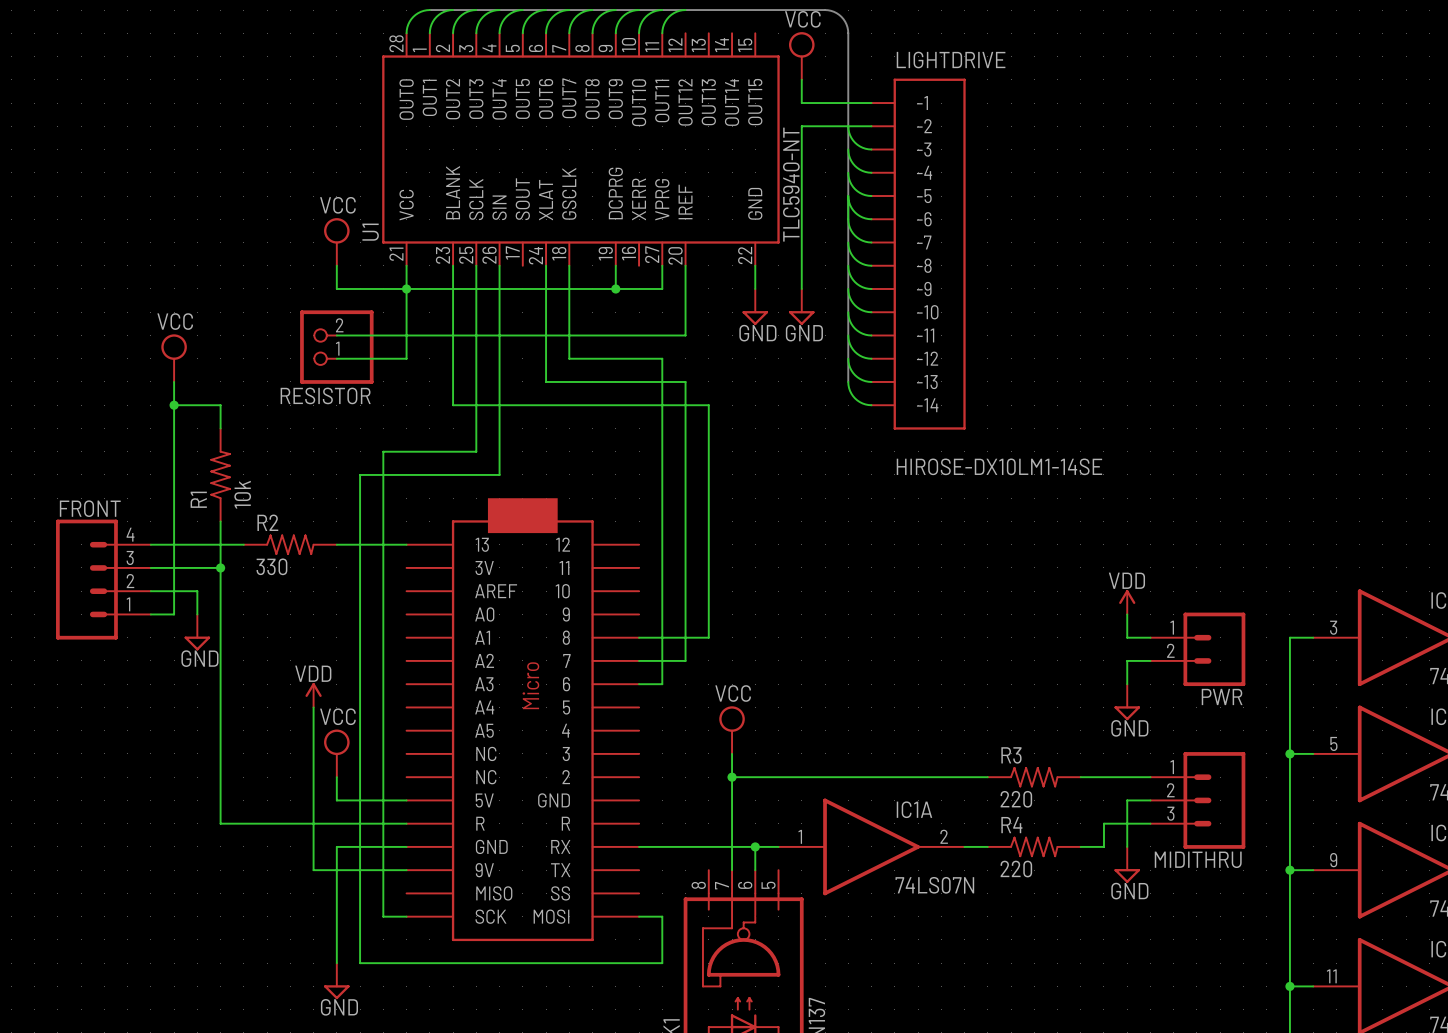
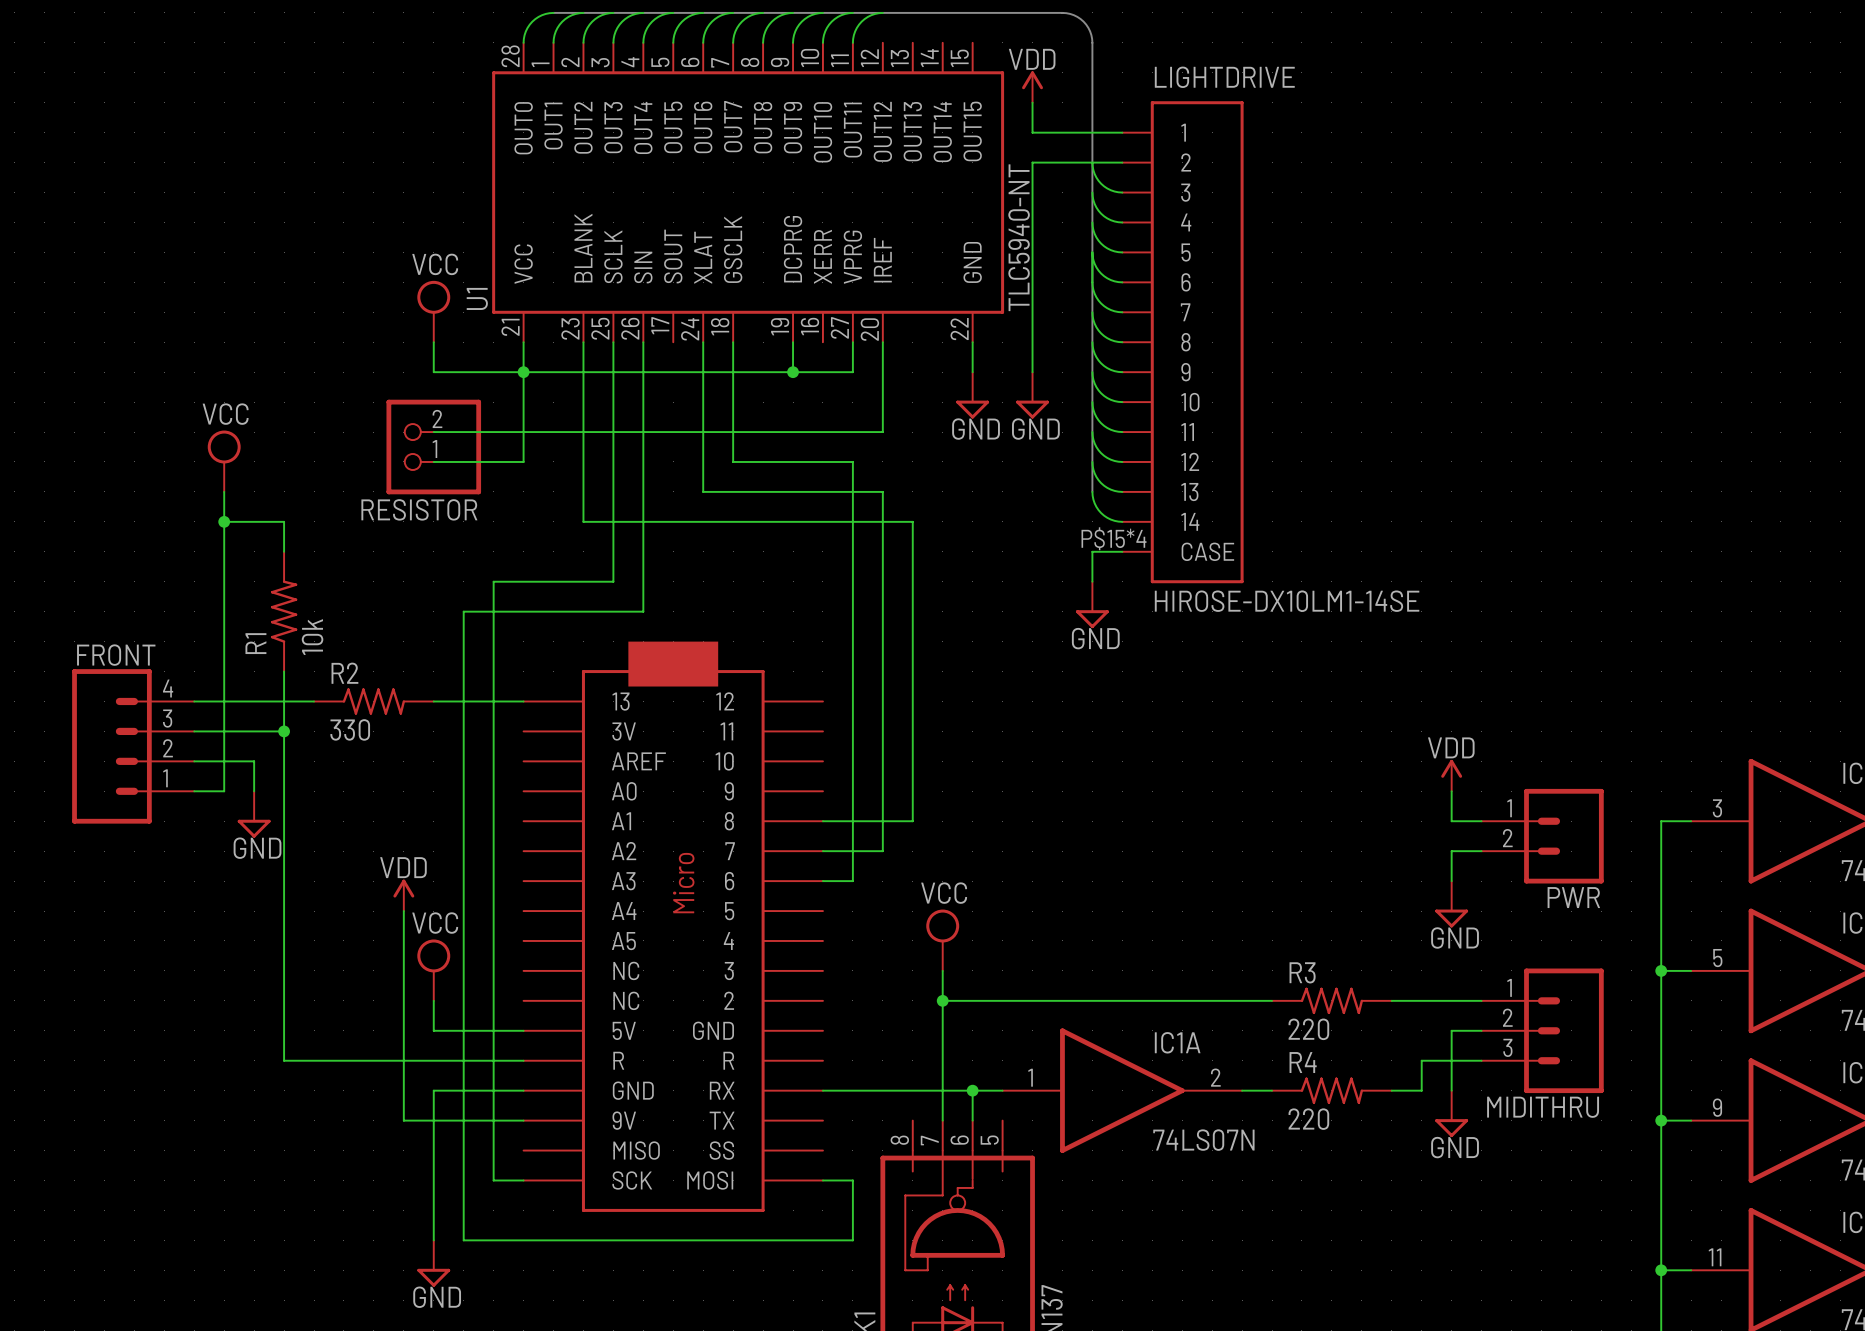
power symbol: VCC (801, 55) -> none
power symbol: none -> VDD (1032, 87)
LIGHTDRIVE: HIROSE-DX10LM1-14SE (918, 254) -> none
LIGHTDRIVE: none -> HIROSE-DX10LM1-14SE (1182, 342)
wire: none -> (1122, 551) (1092, 551) (1092, 581)
power symbol: none -> GND (1092, 604)

